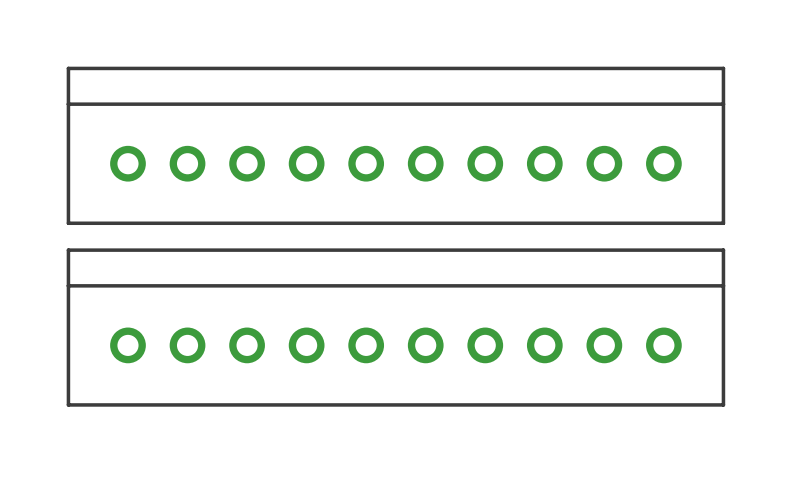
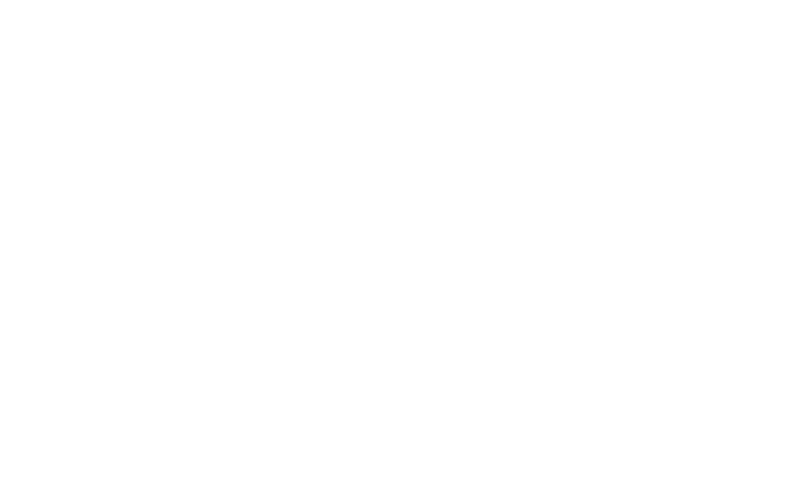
part: (395, 145) -> none
part: (395, 327) -> none

